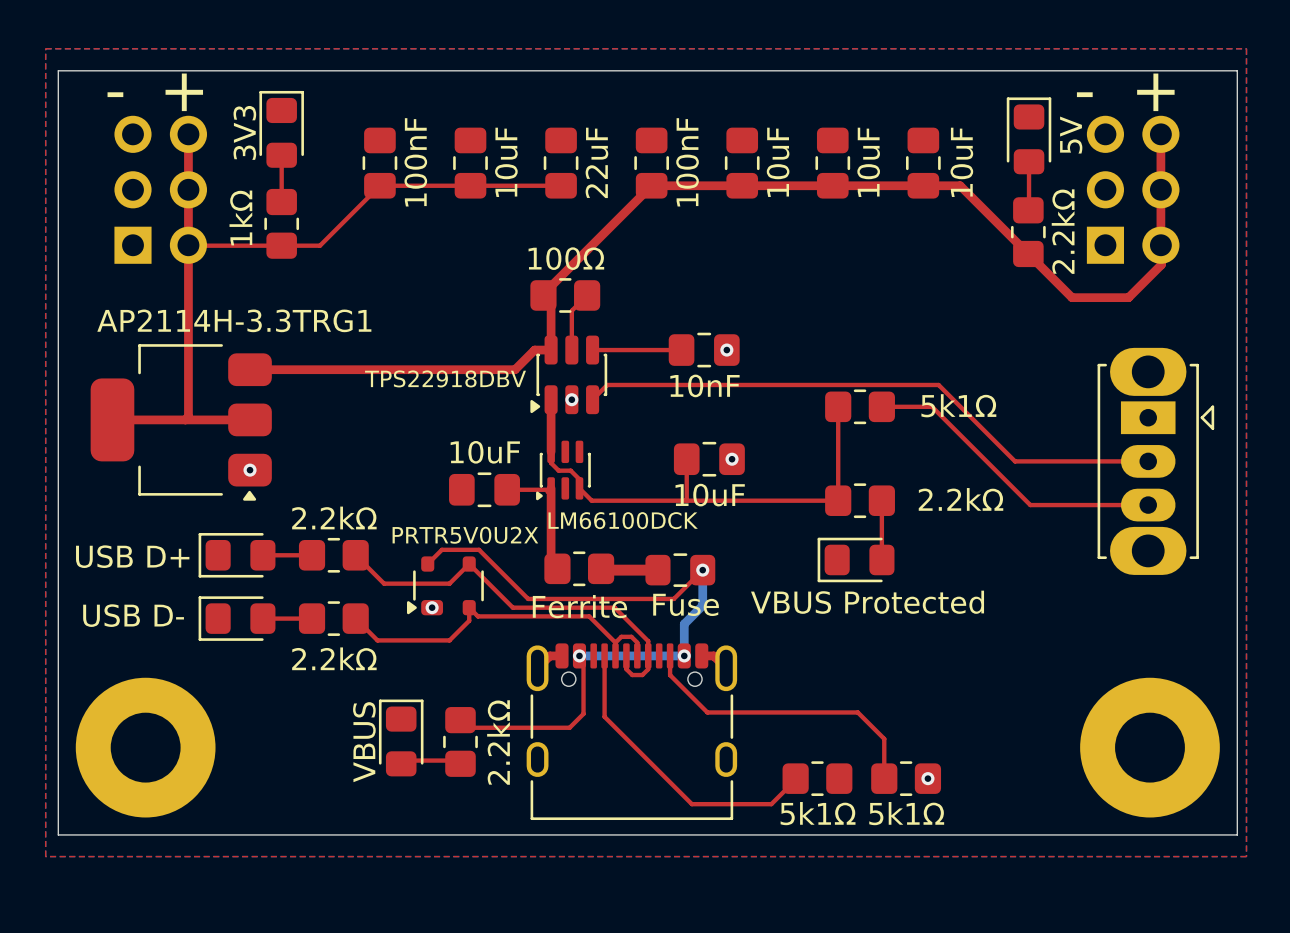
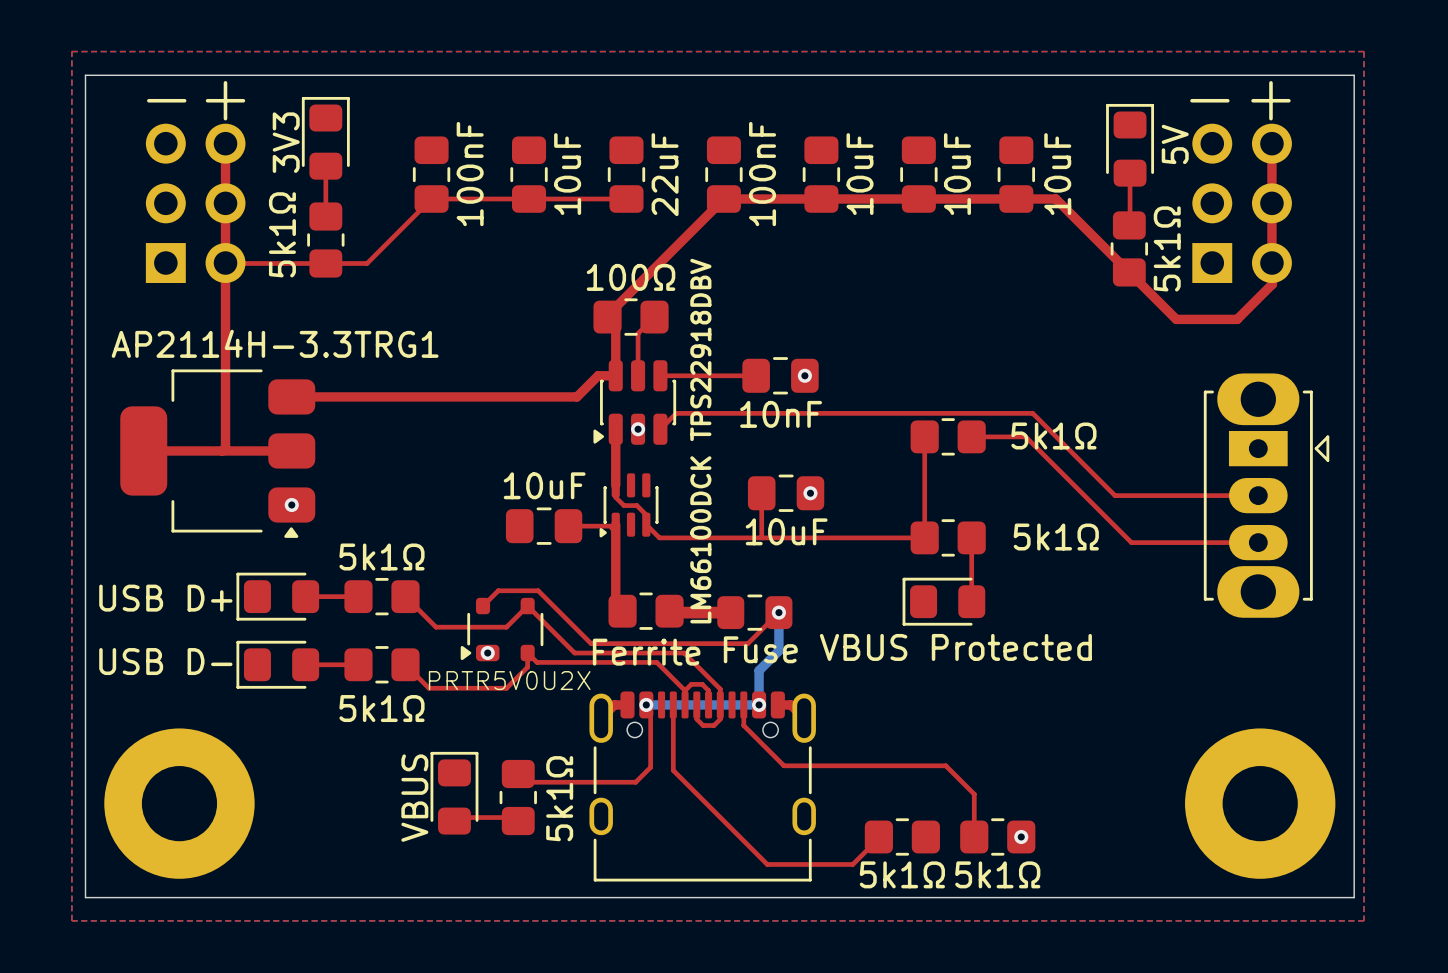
part value: 1kΩ (240, 217) -> 5k1Ω (282, 234)
part value: 2.2kΩ (1063, 231) -> 5k1Ω (1167, 248)
part value rotation: 0° (445, 378) -> 90° counterclockwise (700, 349)
part value position: TPS22918DBV (445, 378) -> TPS22918DBV (700, 349)
part value: 2.2kΩ (961, 499) -> 5k1Ω (1056, 537)
part value: 2.2kΩ (334, 517) -> 5k1Ω (381, 556)
part value rotation: 0° (623, 520) -> 90° counterclockwise (700, 539)
part value position: PRTR5V0U2X (465, 535) -> PRTR5V0U2X (509, 680)
part value: 2.2kΩ (334, 658) -> 5k1Ω (381, 708)
part value: 2.2kΩ (498, 742) -> 5k1Ω (559, 798)

